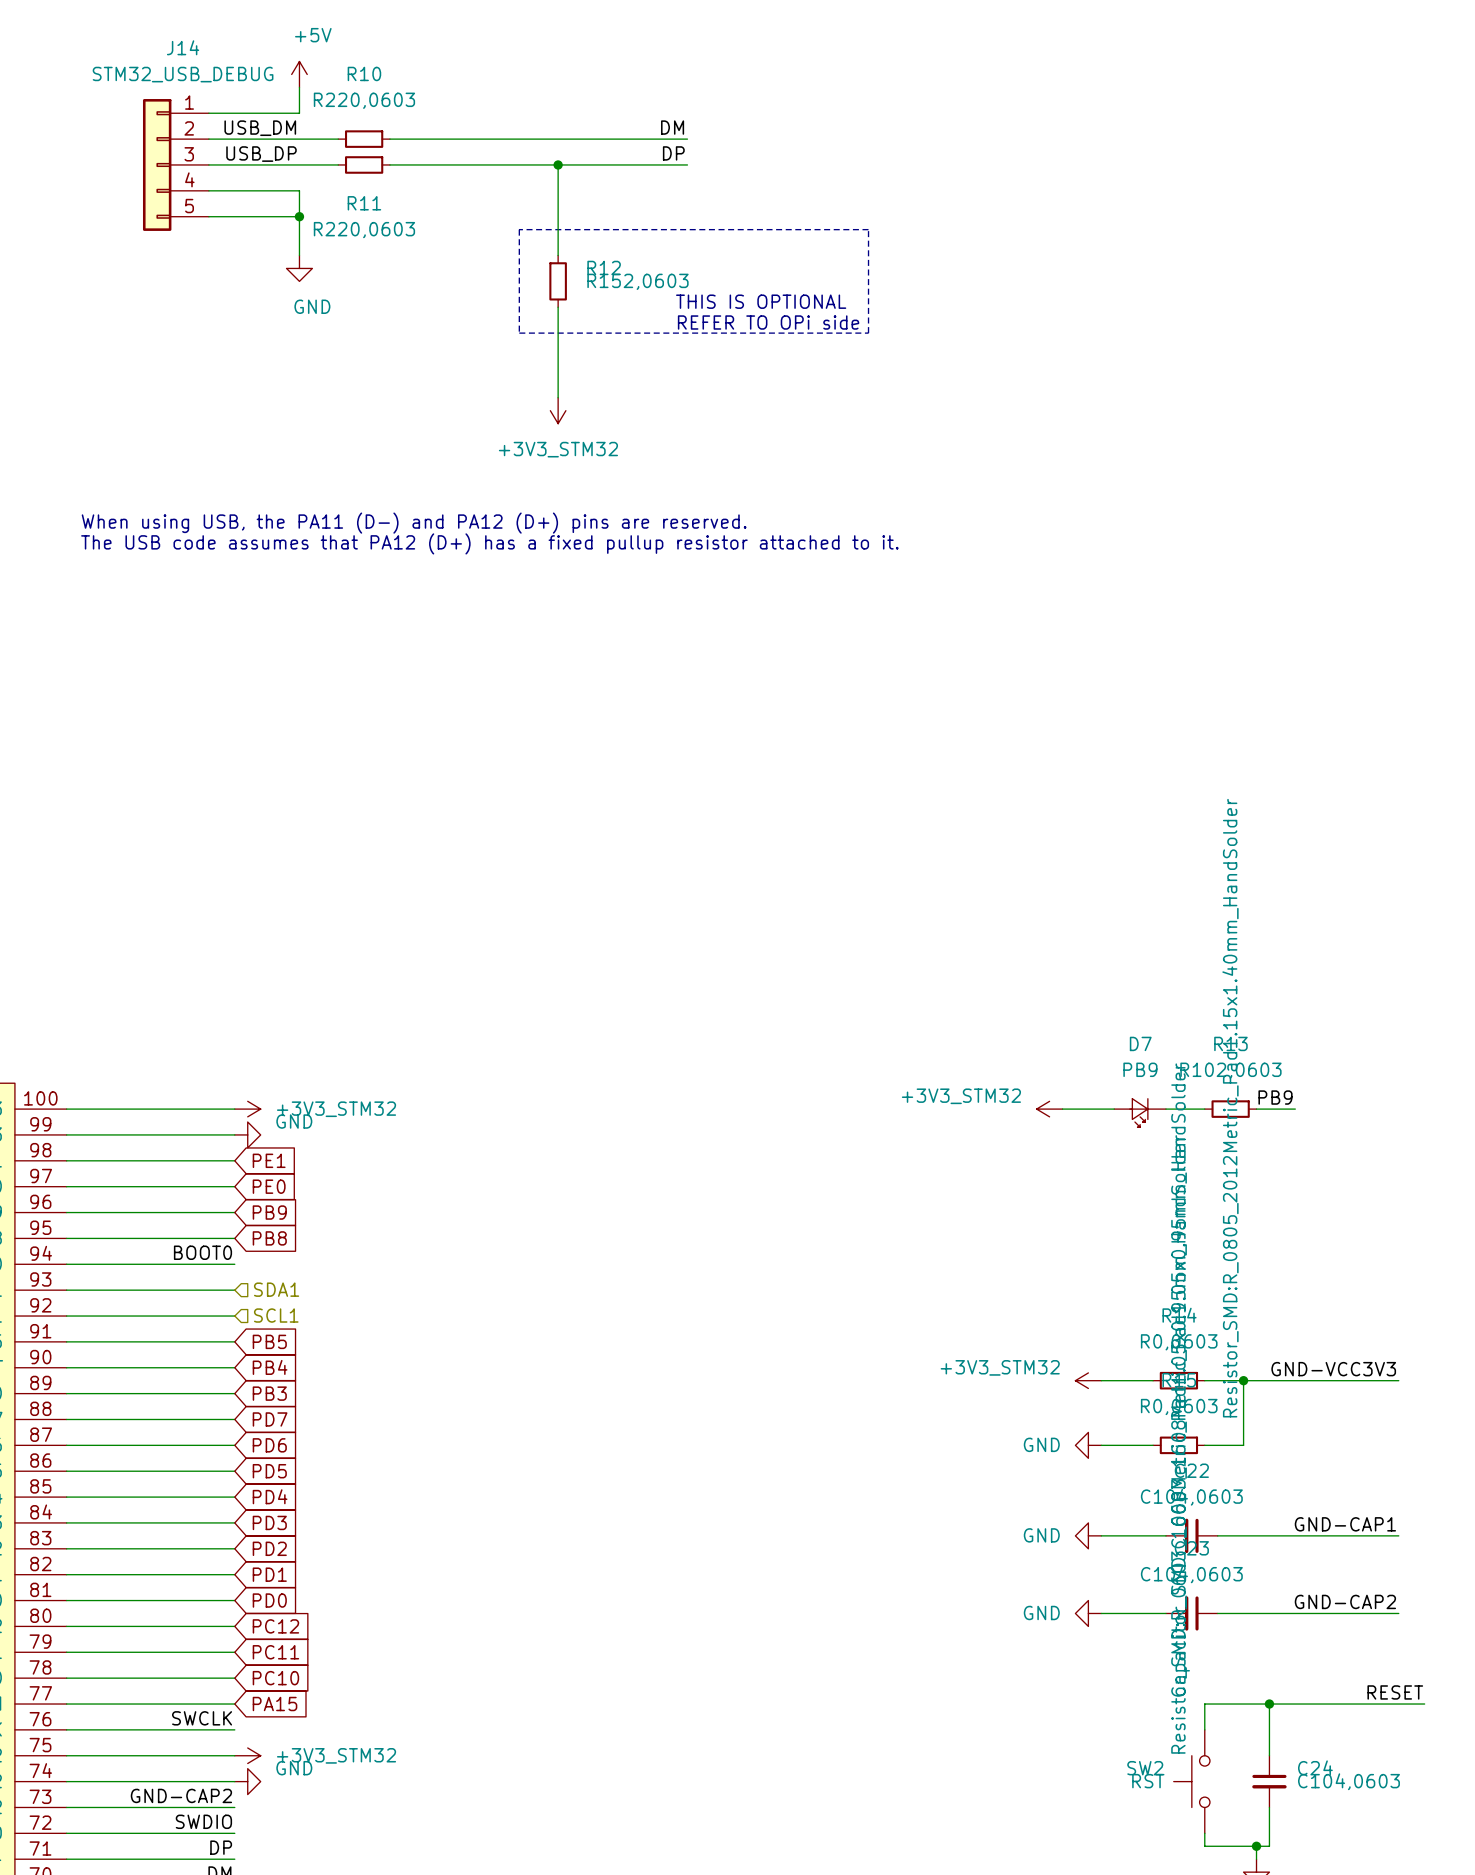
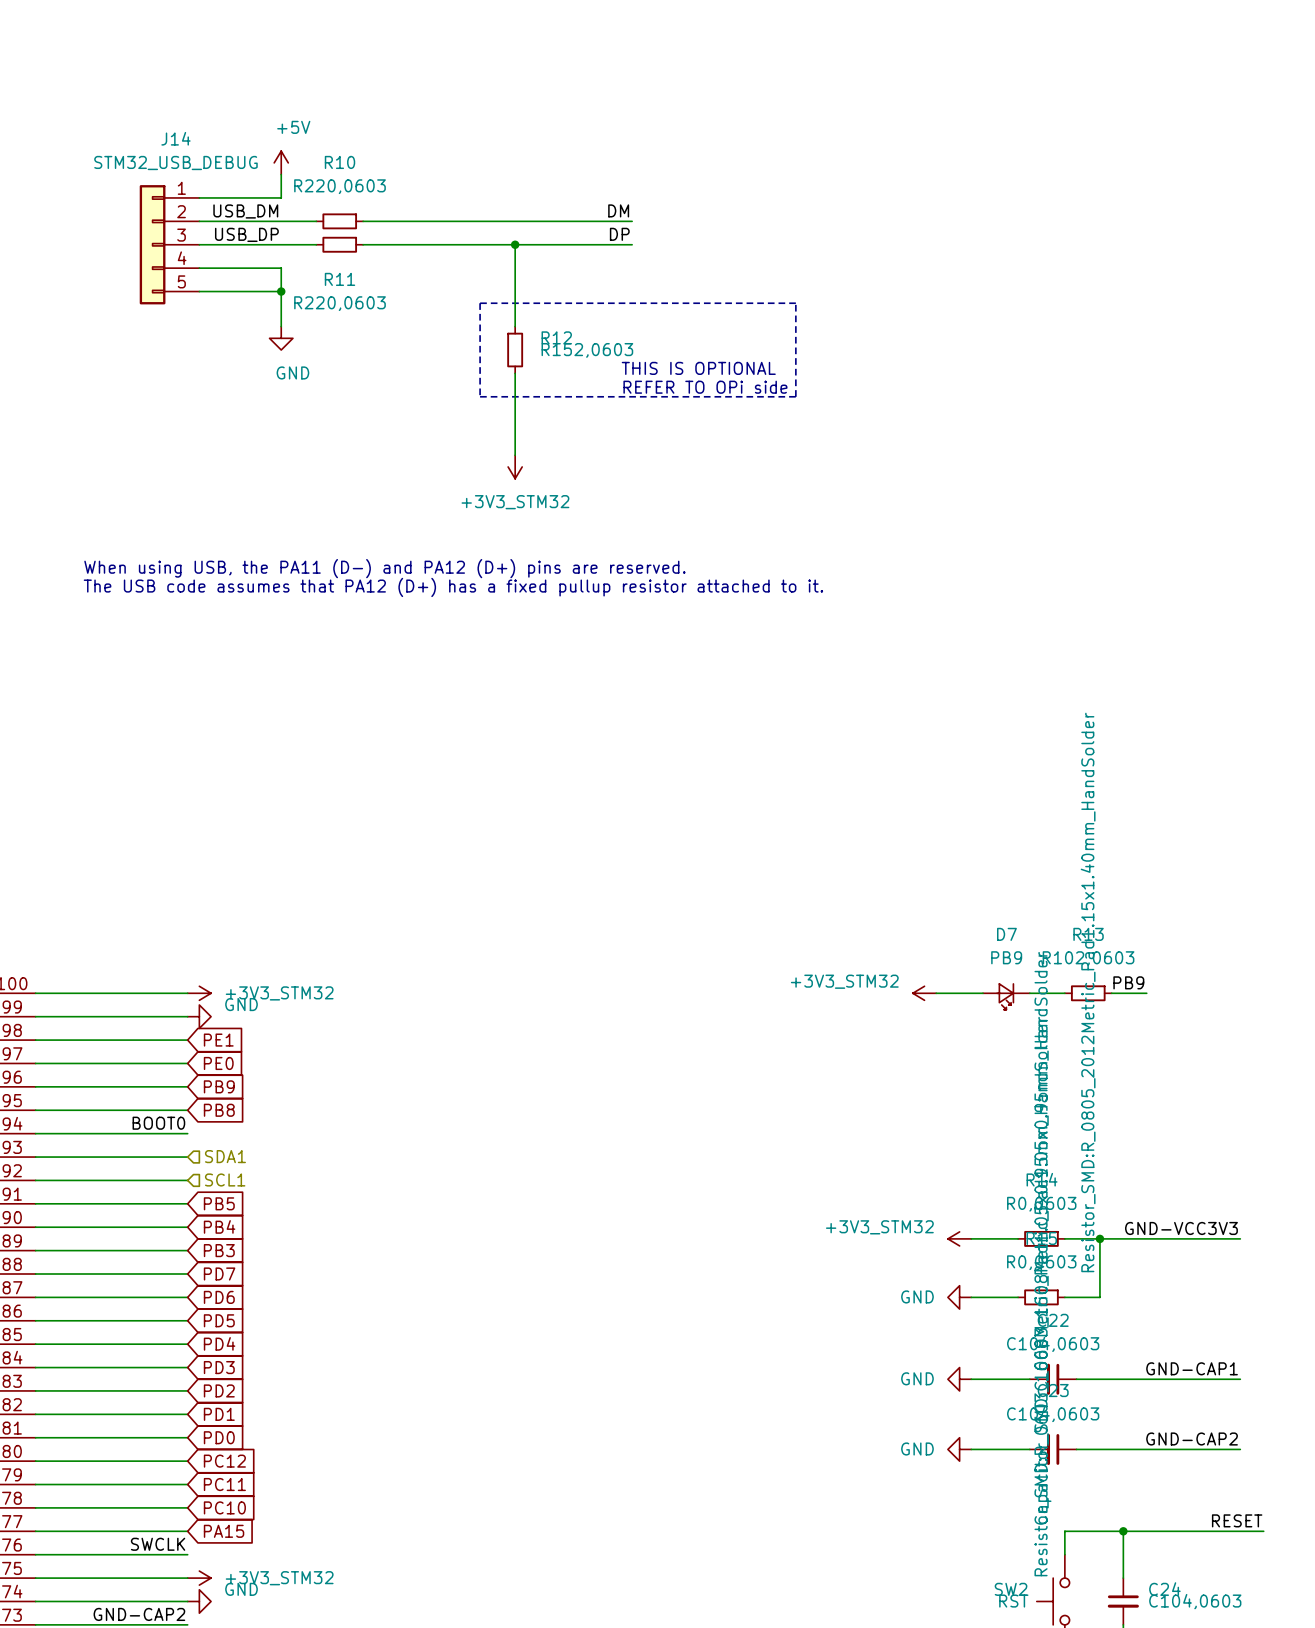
power symbol position: +5V (299, 74) -> +5V (281, 162)
wire: (299, 87) (299, 113) (208, 113) -> (281, 174) (281, 197) (199, 197)
label position: DM (672, 127) -> DM (618, 210)
label position: USB_DM (260, 128) -> USB_DM (245, 211)
wire: (208, 139) (338, 139) -> (199, 221) (316, 221)
R10 position: (364, 139) -> (339, 221)
wire: (389, 139) (687, 139) -> (363, 221) (632, 221)
label position: DP (673, 153) -> DP (619, 234)
label position: USB_DP (261, 154) -> USB_DP (246, 234)
J14 position: (175, 164) -> (169, 244)
wire: (208, 164) (338, 164) -> (199, 244) (316, 244)
R11 position: (364, 164) -> (339, 244)
wire: (389, 164) (687, 164) -> (363, 244) (632, 244)
wire: (558, 164) (558, 255) -> (515, 244) (515, 326)
junction: (558, 164) -> none
wire: (208, 190) (299, 190) (299, 255) -> (199, 268) (281, 268) (281, 326)
wire: (208, 216) (299, 216) -> (199, 291) (281, 291)
junction: (299, 216) -> none
line: (519, 229) (519, 333) (868, 333) (868, 229) (519, 229) -> (480, 303) (480, 396) (795, 396) (795, 303) (480, 303)
power symbol position: GND (299, 268) -> GND (281, 338)
R12 position: (558, 281) -> (515, 350)
junction: none -> (515, 244)
text position: THIS IS OPTIONAL (761, 301) -> THIS IS OPTIONAL (698, 368)
wire: (558, 307) (558, 397) -> (515, 373) (515, 455)
text position: REFER TO OPi side (768, 322) -> REFER TO OPi side (705, 387)
junction: none -> (281, 291)
power symbol position: +3V3_STM32 (558, 410) -> +3V3_STM32 (515, 466)
text position: When using USB, the PA11 (D-) and PA12 (D+) pins are reserved. (414, 523) -> When using USB, the PA11 (D-) and PA12 (D+) pins are reserved. (384, 568)
text position: The USB code assumes that PA12 (D+) has a fixed pullup resistor attached to it. (489, 543) -> The USB code assumes that PA12 (D+) has a fixed pullup resistor attached to it. (453, 587)

